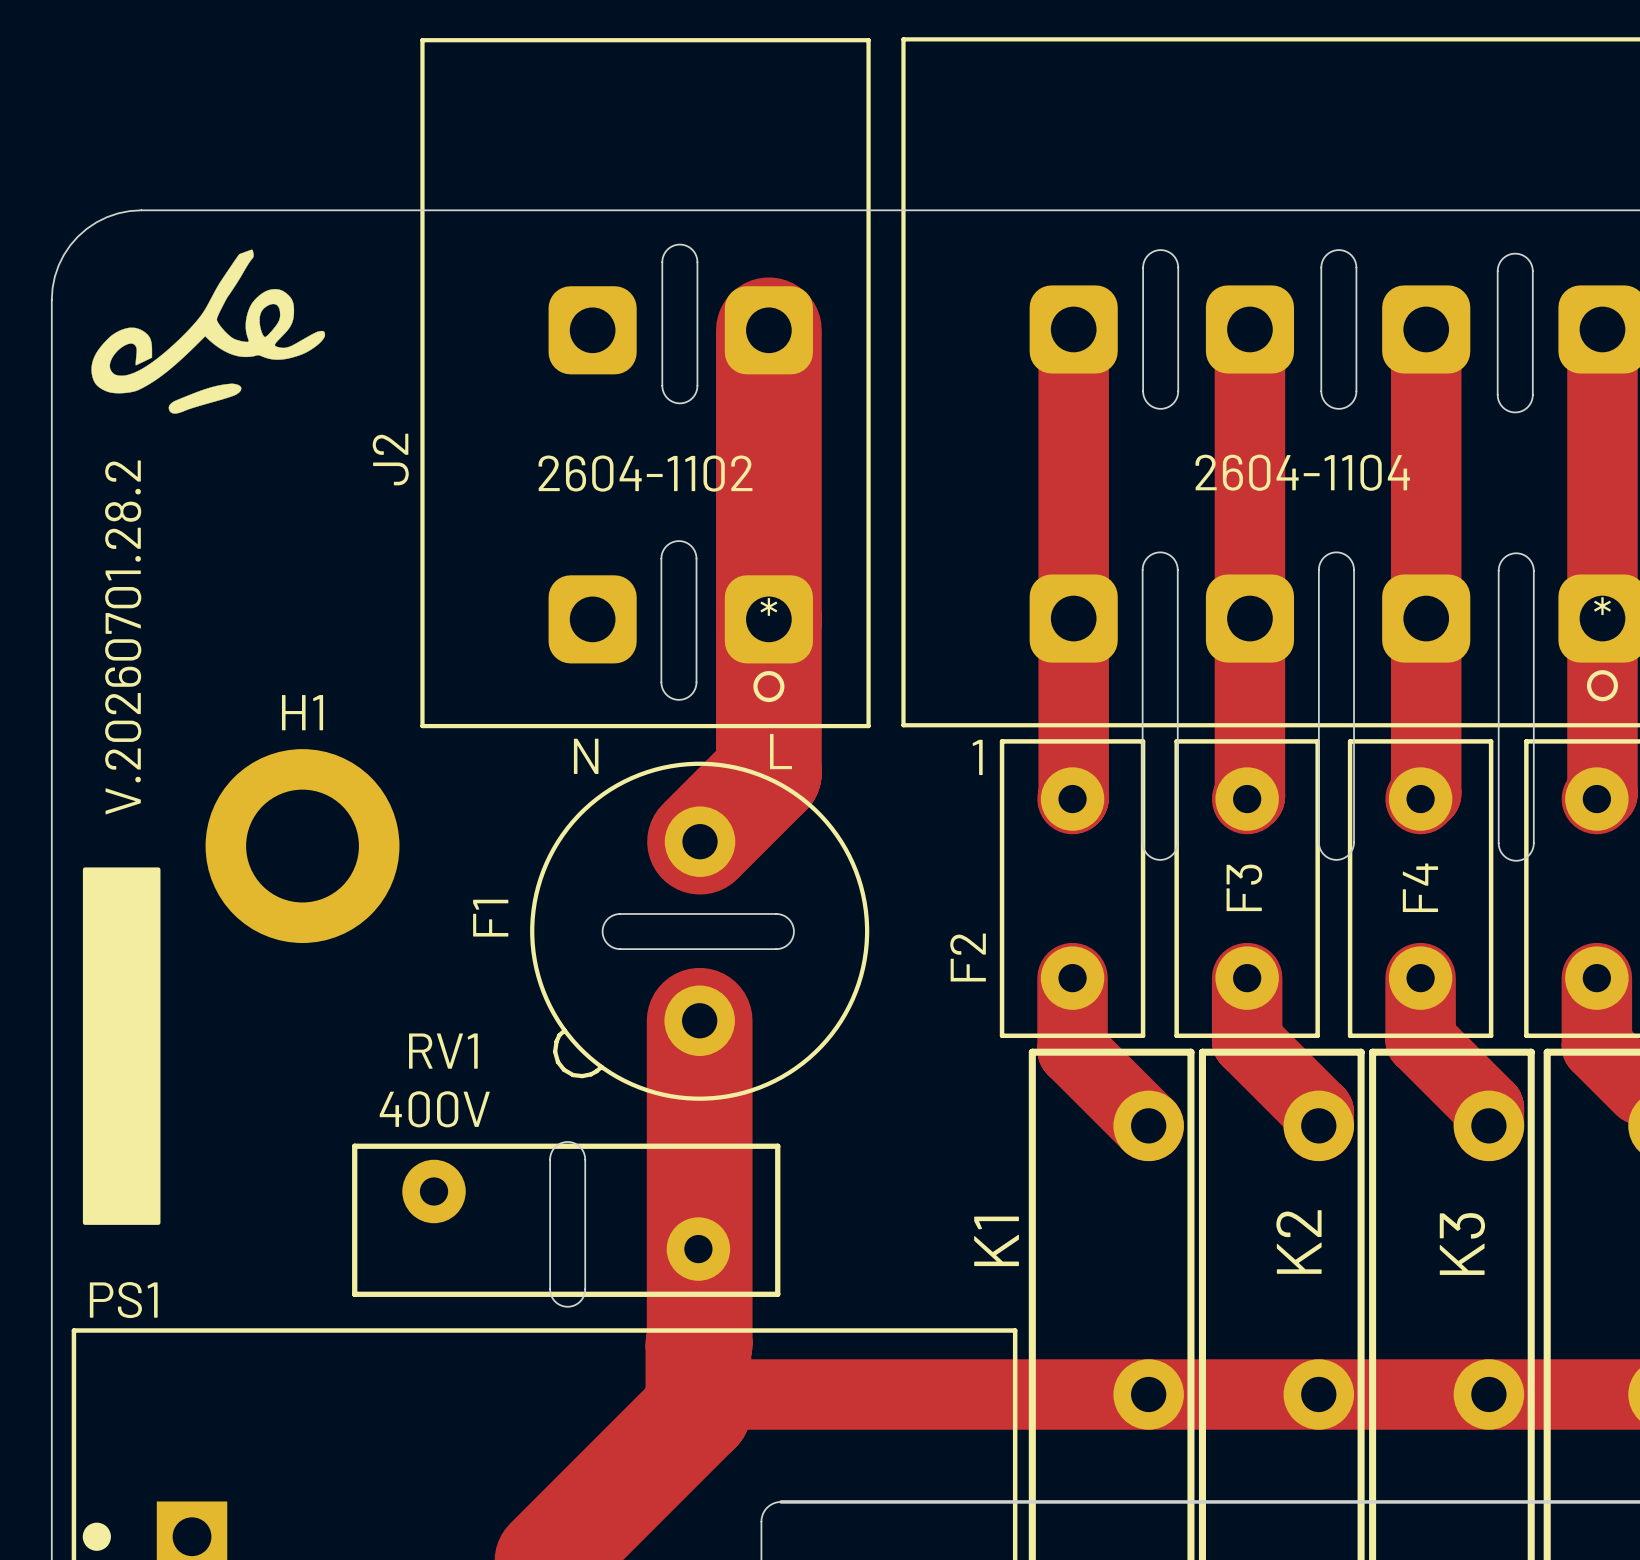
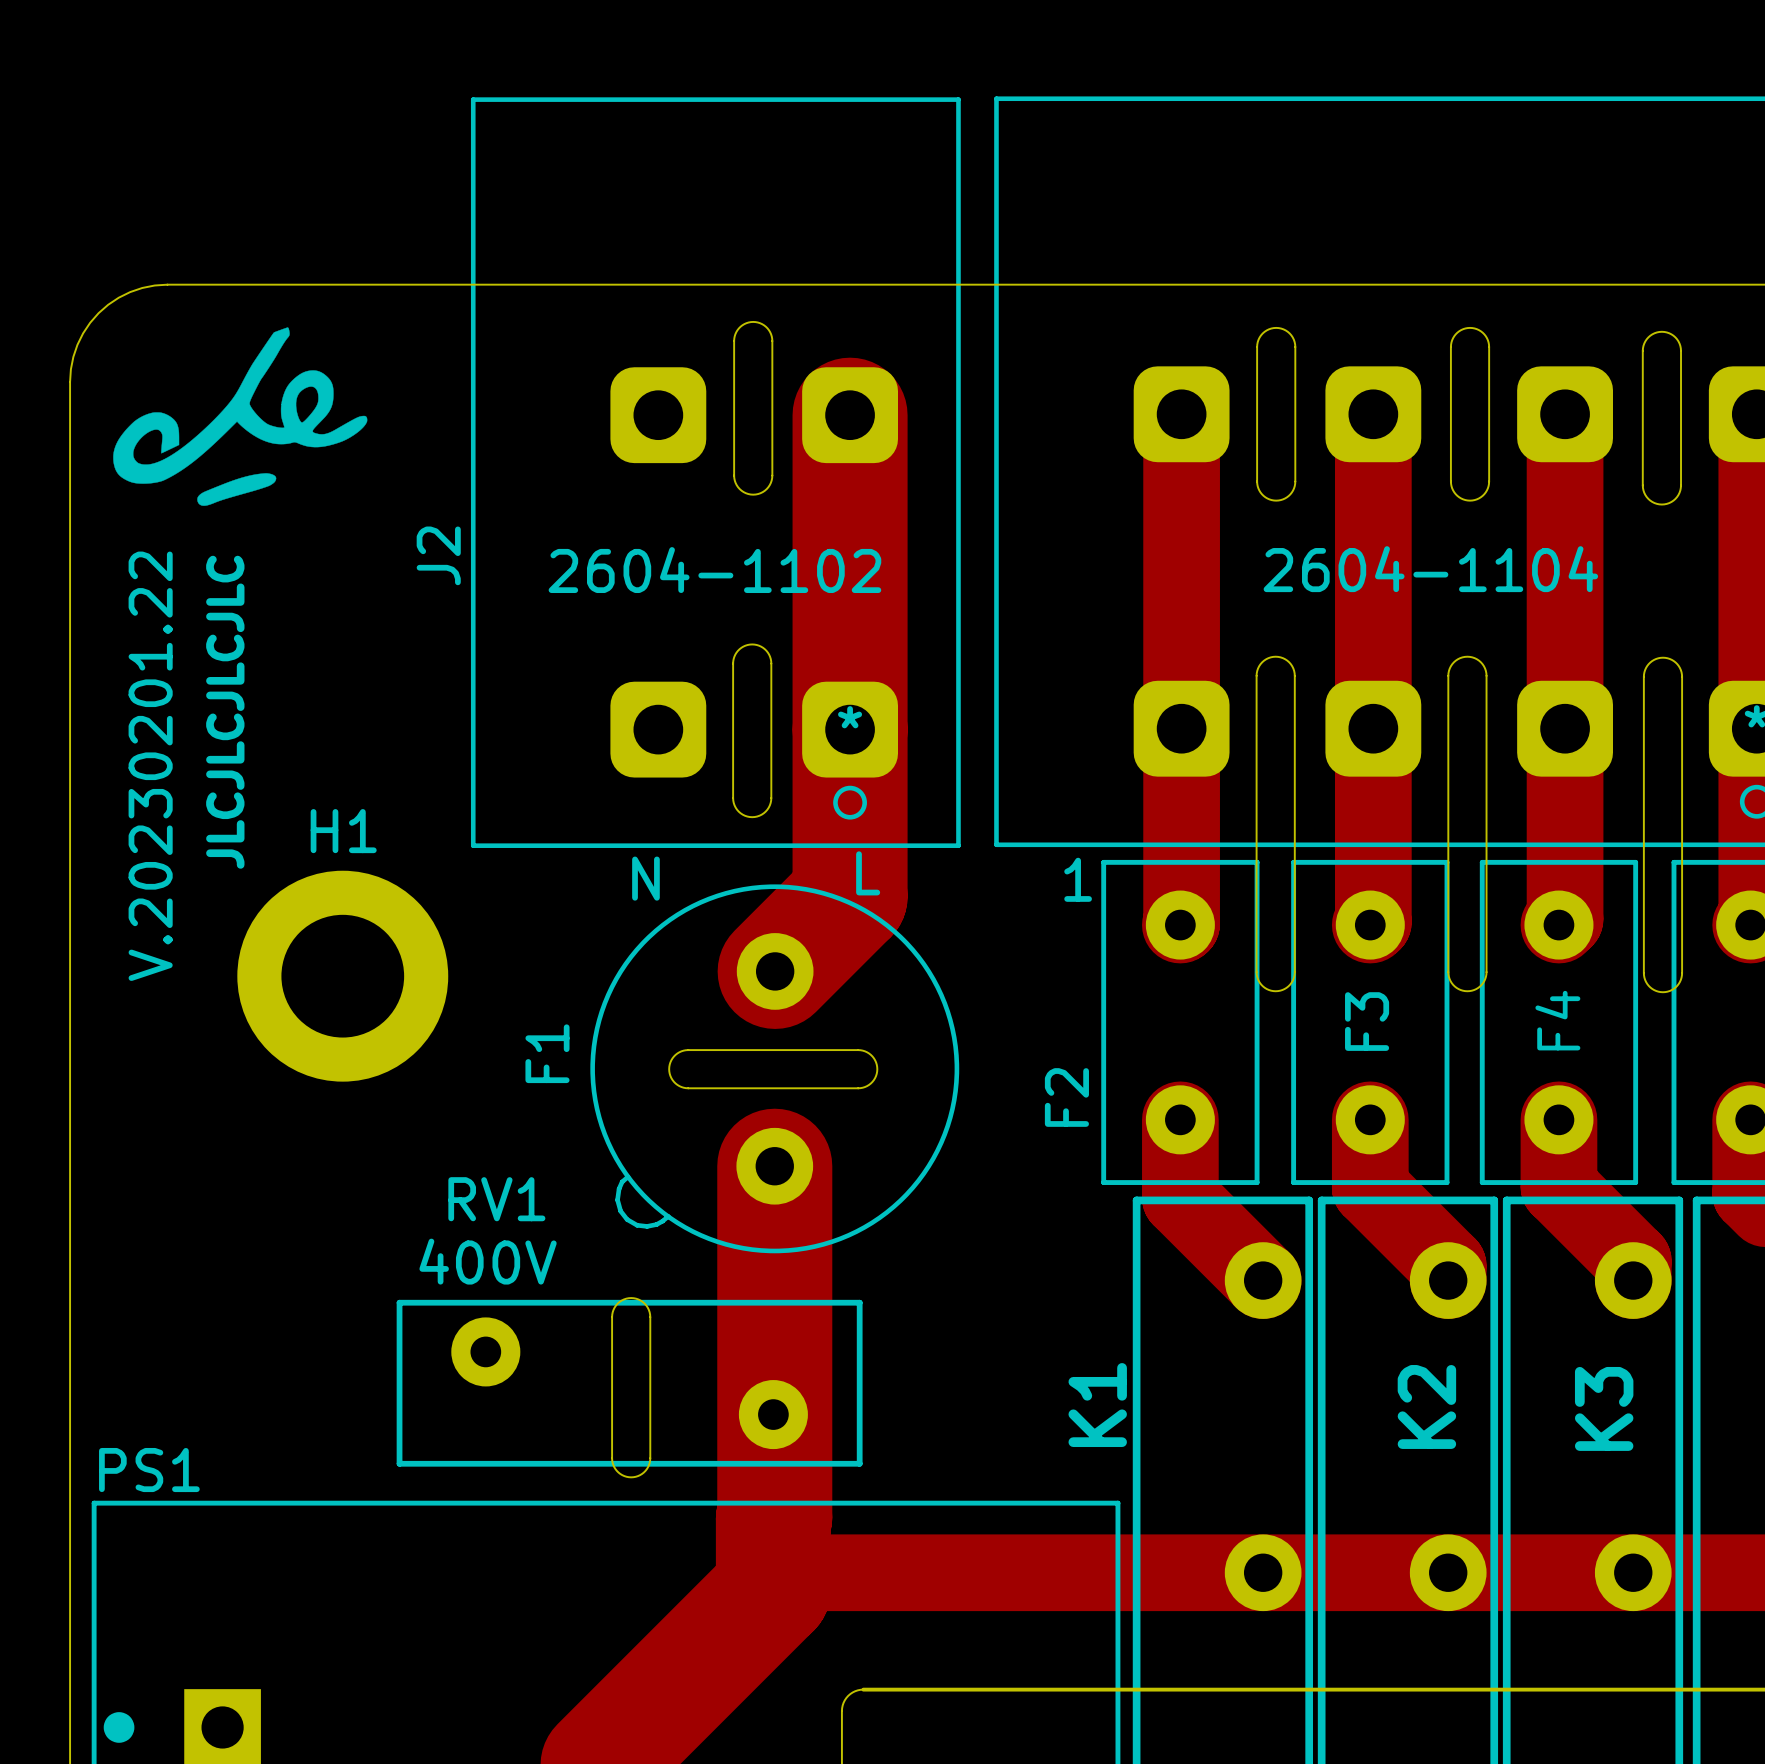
text: none -> JLCJLCJLCJLC (225, 712)
text: V.20260701.28.2 (123, 637) -> V.20230201.22 (150, 766)
drawing: [82, 867, 161, 1225] -> none

